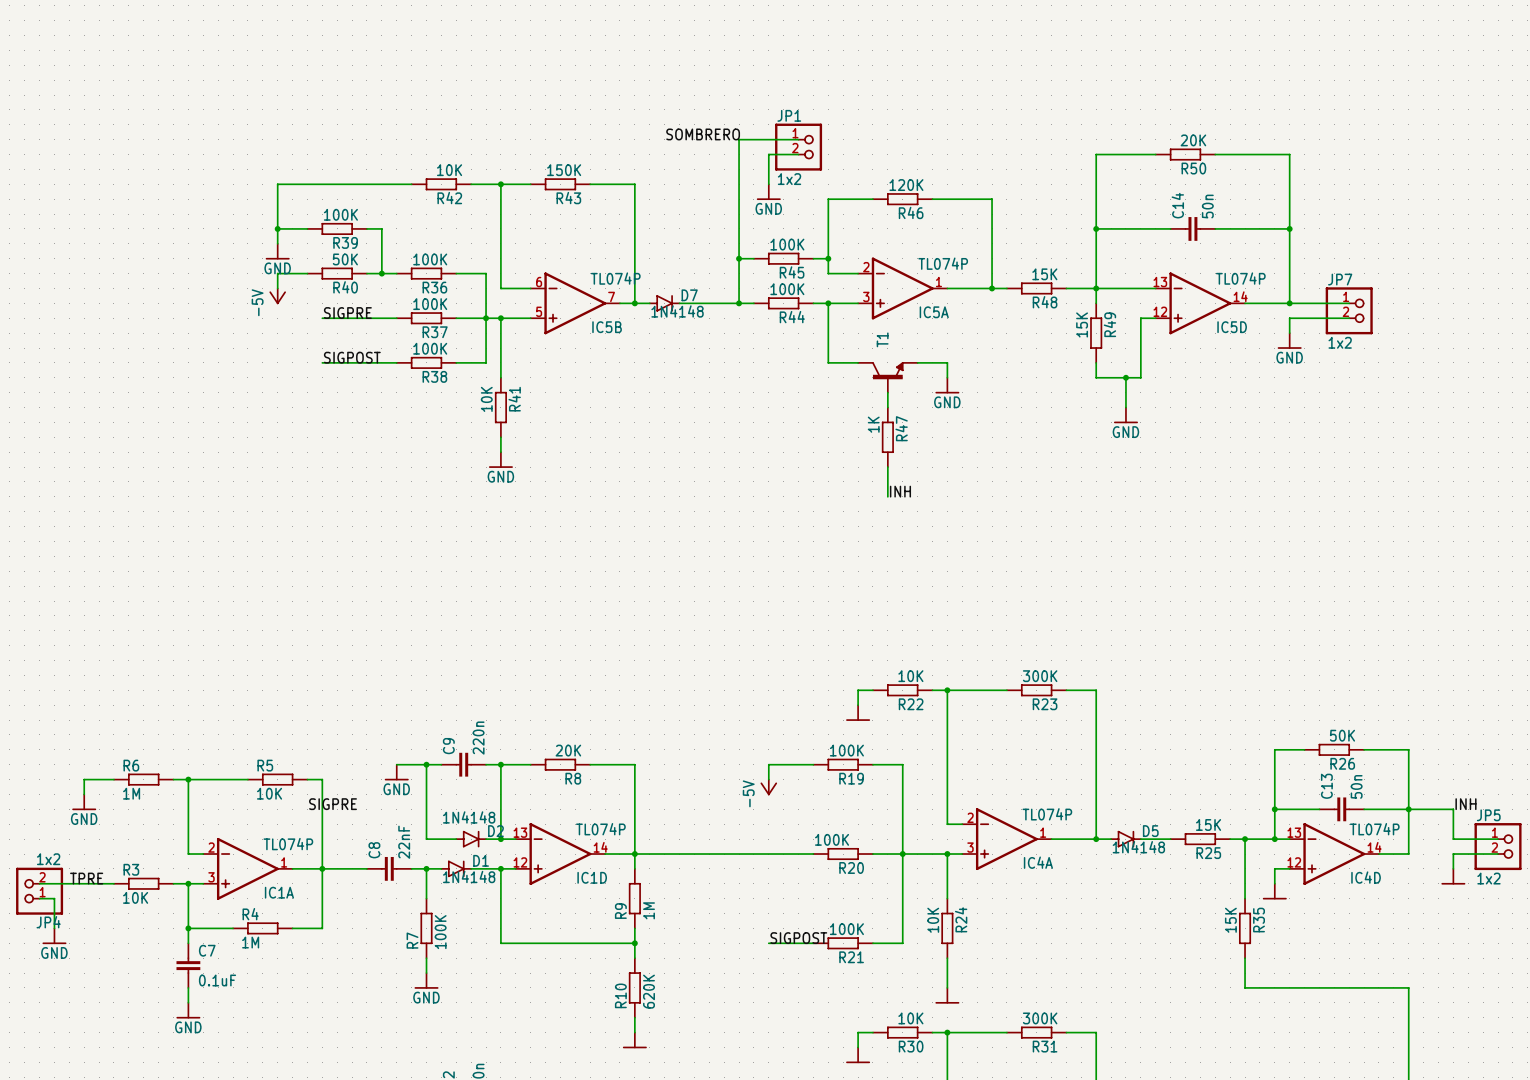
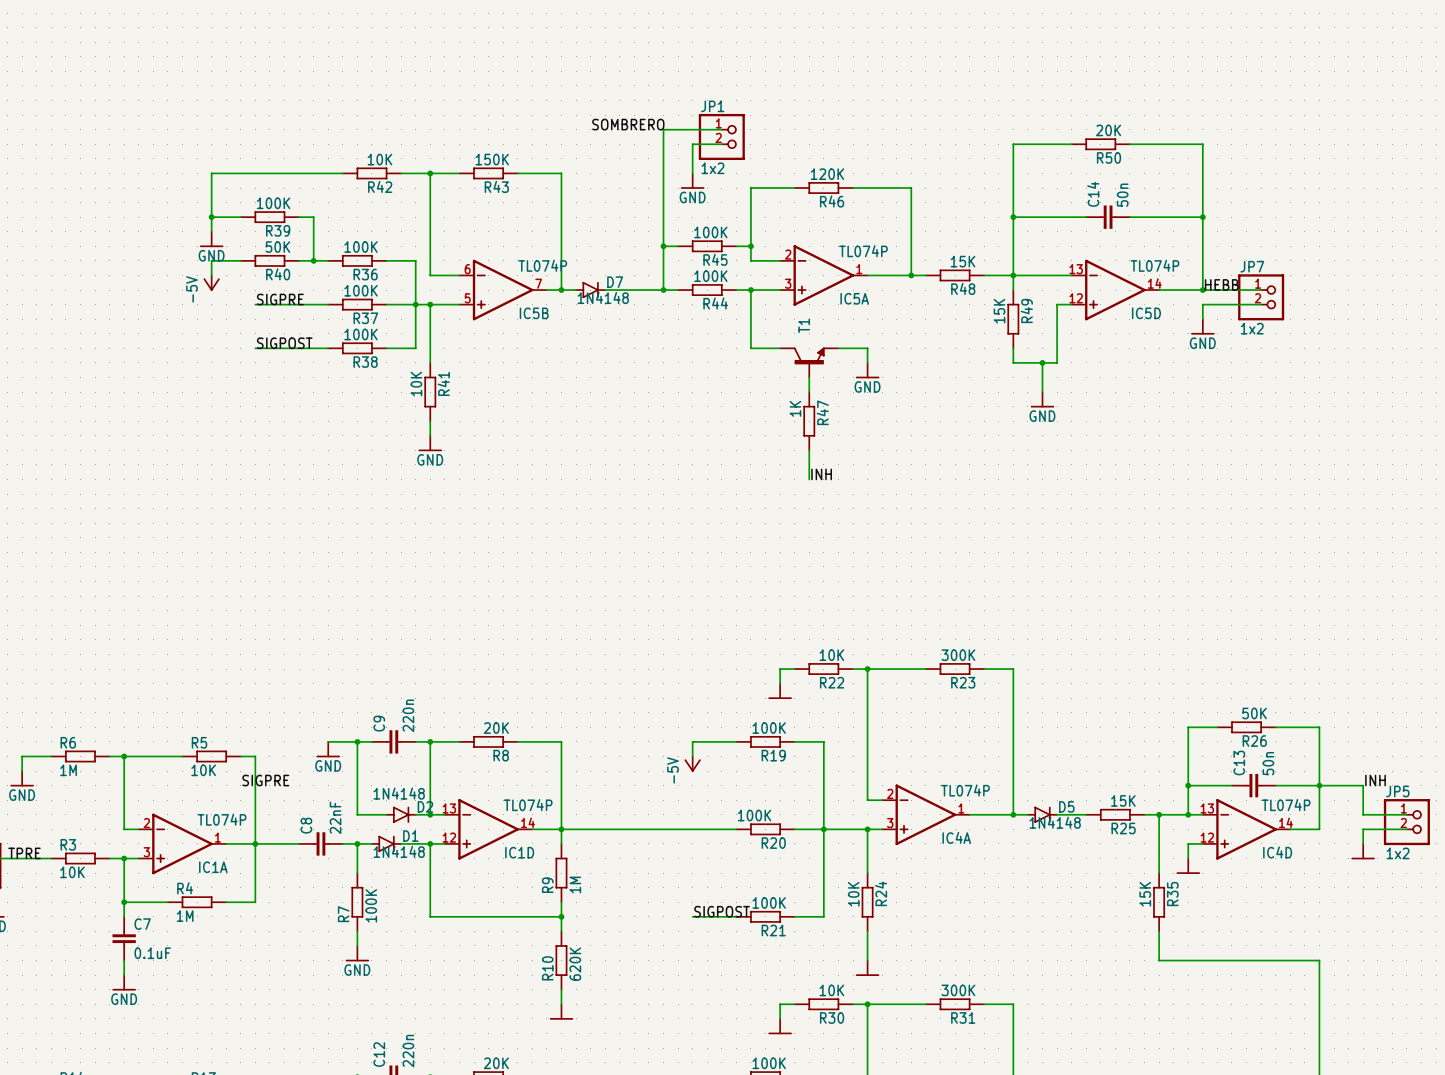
label: none -> HEBB (1221, 284)

